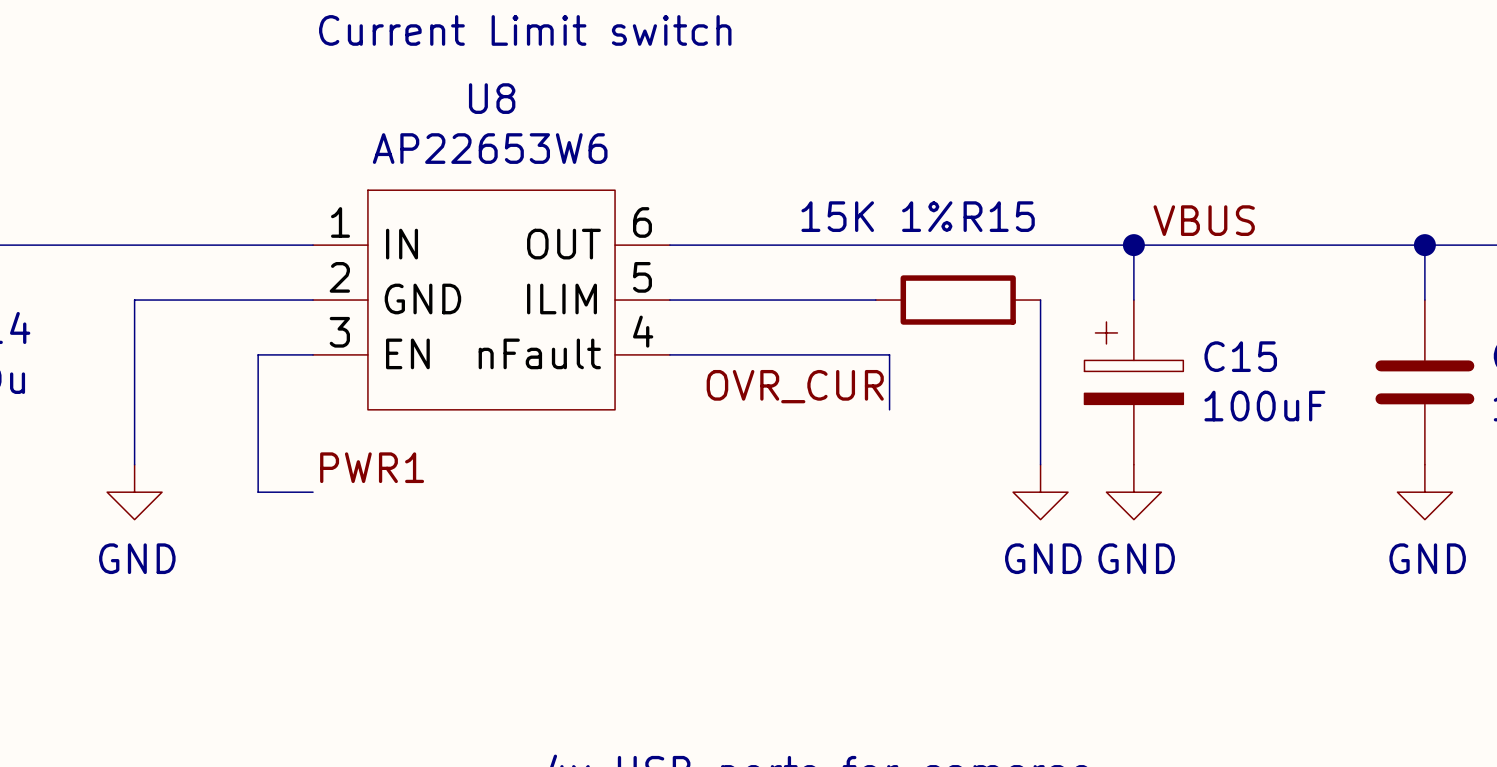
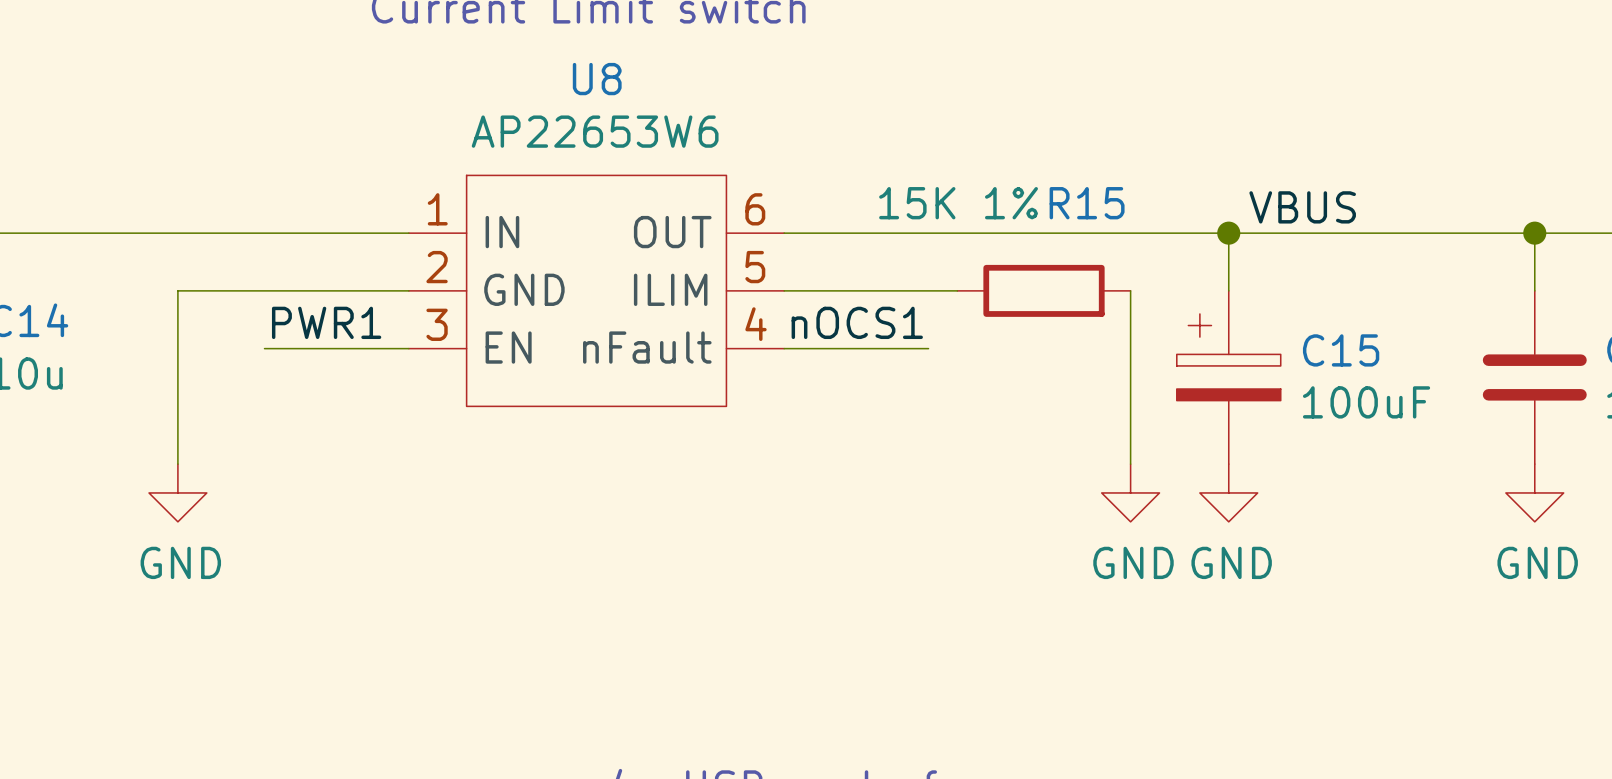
U8 position: (491, 300) -> (596, 290)
label: none -> nOCS1 (857, 322)
wire: (258, 354) (258, 492) (313, 492) -> (307, 348) (264, 348)
wire: (848, 354) (889, 354) (889, 409) -> none
label: OVR_CUR (795, 386) -> none
label position: PWR1 (372, 467) -> PWR1 (326, 322)

